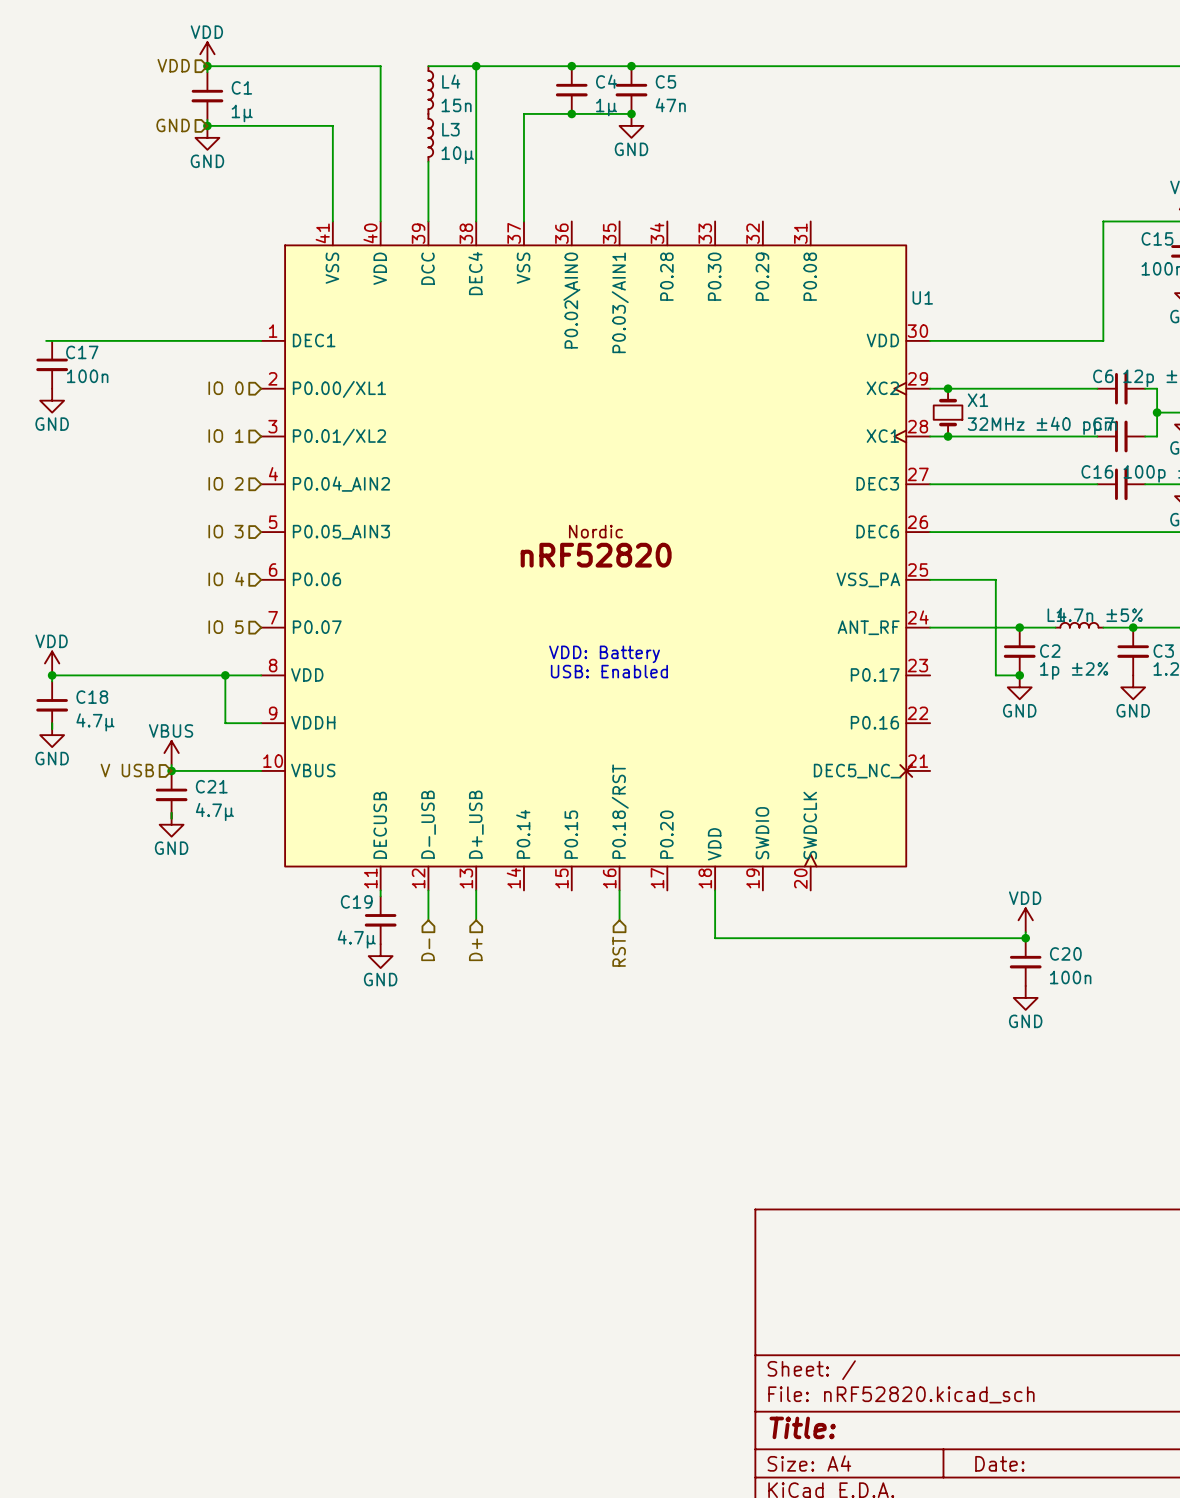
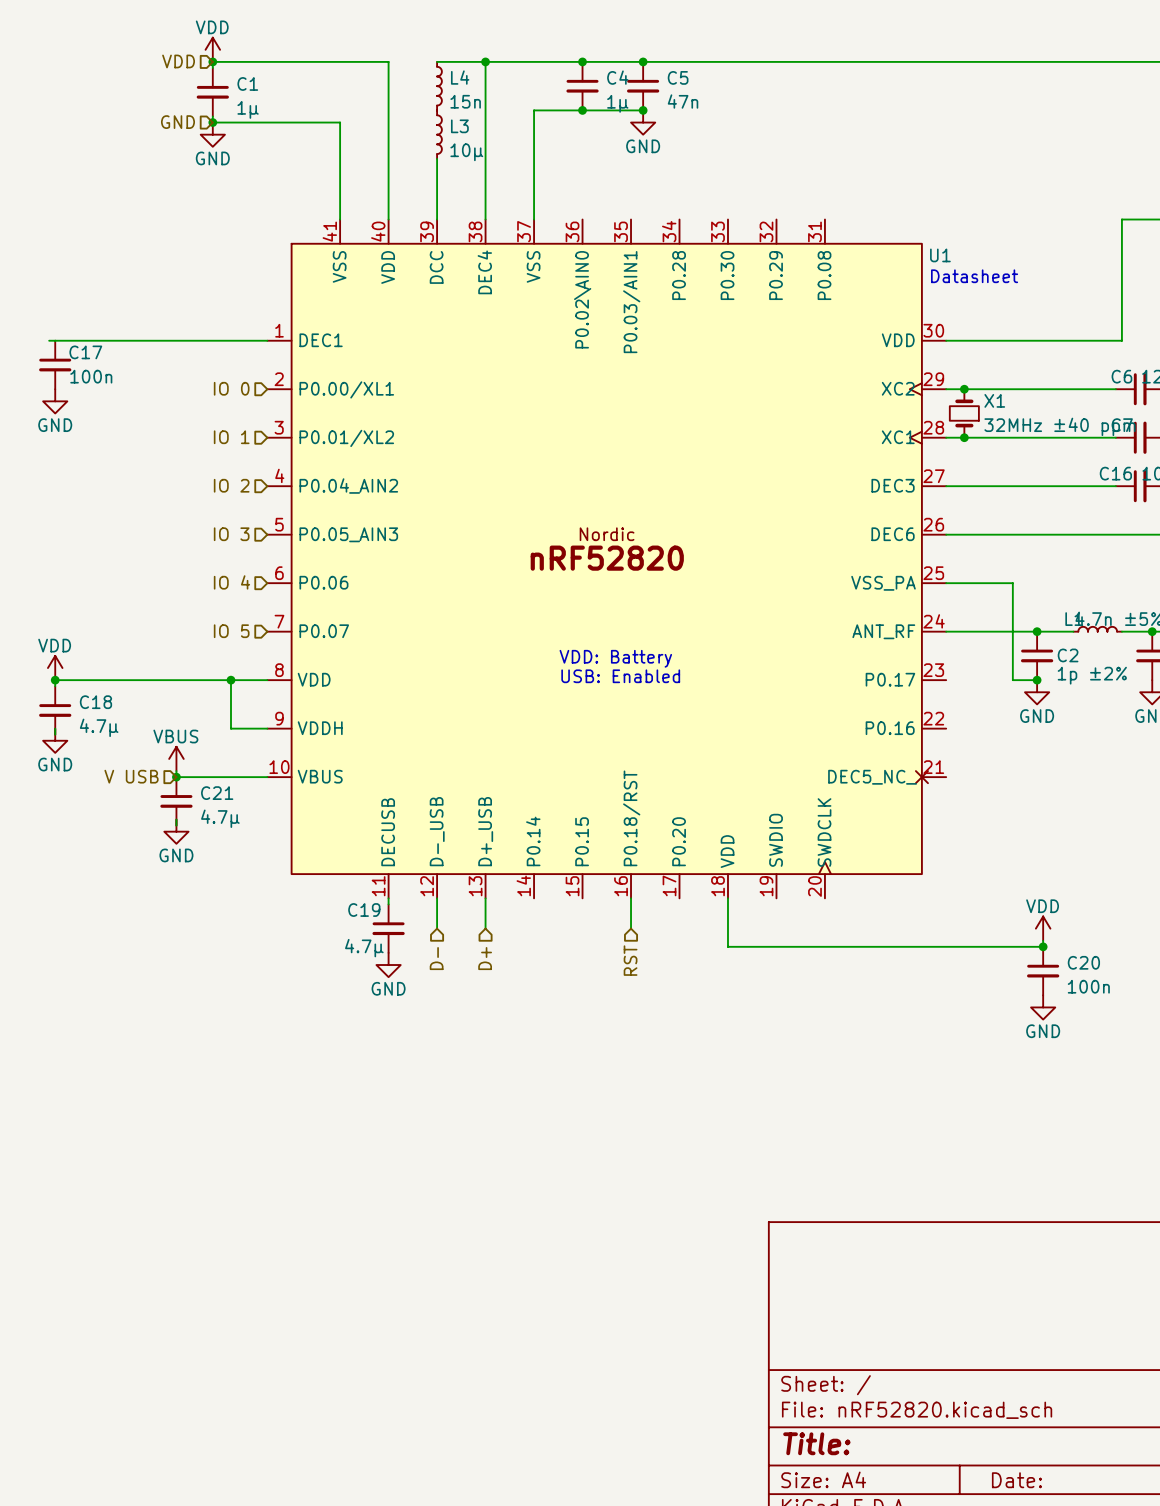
text: none -> Datasheet (974, 276)
U1 name position: U1 (922, 297) -> U1 (940, 255)

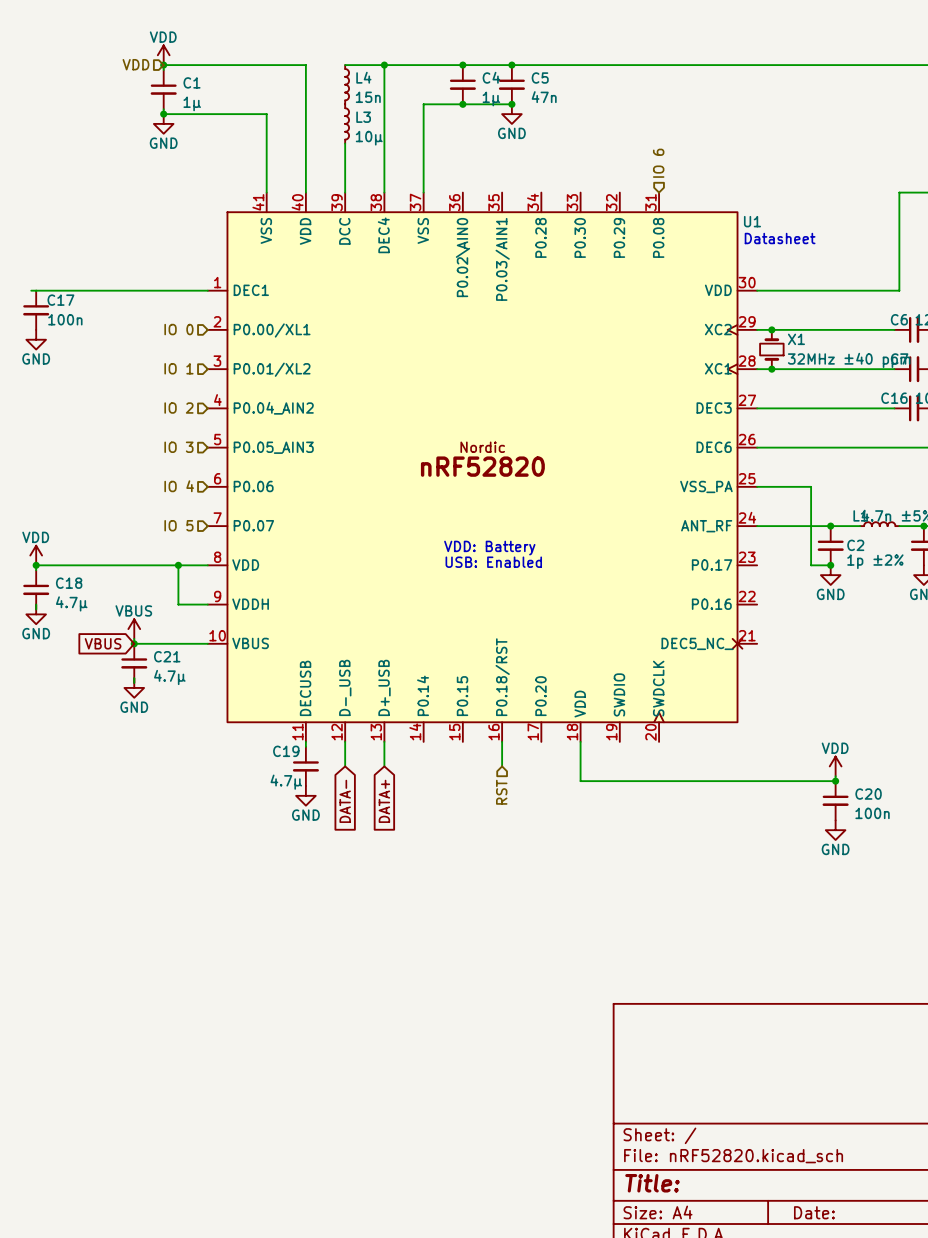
hierarchical label: GND (177, 122) -> none
hierarchical label: none -> IO 6 (658, 163)
hierarchical label: V USB (131, 776) -> none
global label: none -> VBUS (103, 643)
hierarchical label: D- (436, 958) -> none
hierarchical label: D+ (485, 958) -> none
global label: none -> DATA- (345, 801)
global label: none -> DATA+ (384, 801)

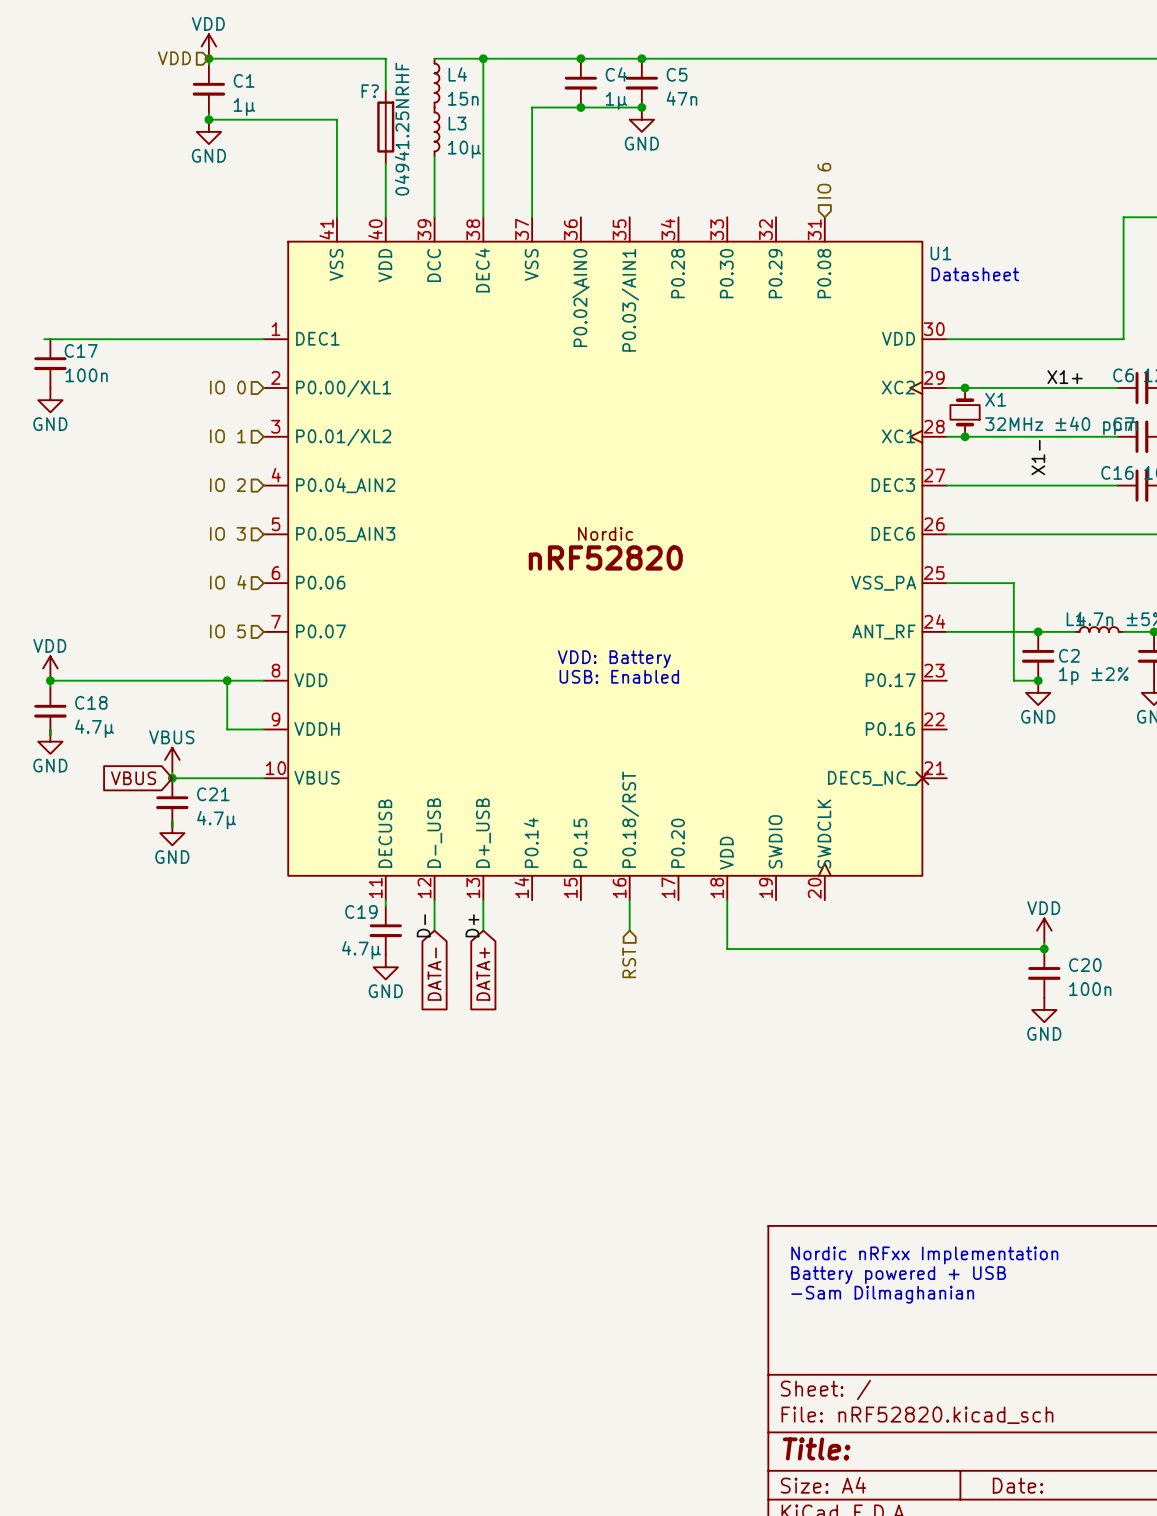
F?: none -> 04941.25NRHF (385, 127)
label: none -> X1+ (1065, 377)
label: none -> X1- (1038, 457)
label: none -> D- (423, 925)
label: none -> D+ (472, 925)
text: none -> Nordic nRFxx Implementation (924, 1255)
text: none -> Battery powered + USB (898, 1275)
text: none -> -Sam Dilmaghanian (882, 1294)

